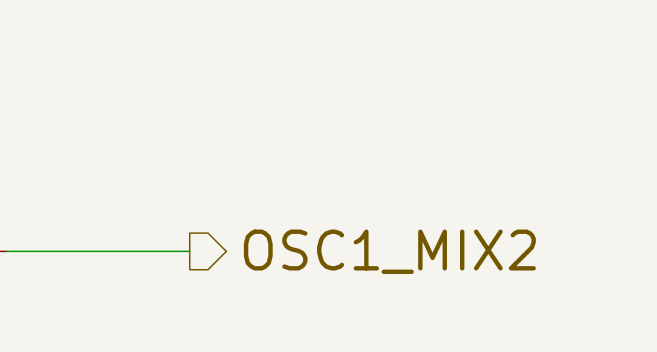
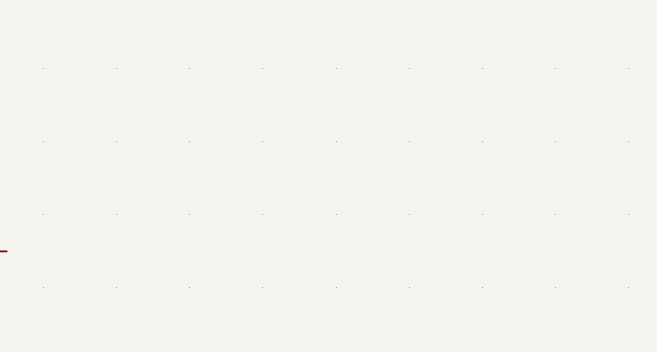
wire: (6, 251) (189, 251) -> none
hierarchical label: OSC1_MIX2 (389, 251) -> none

